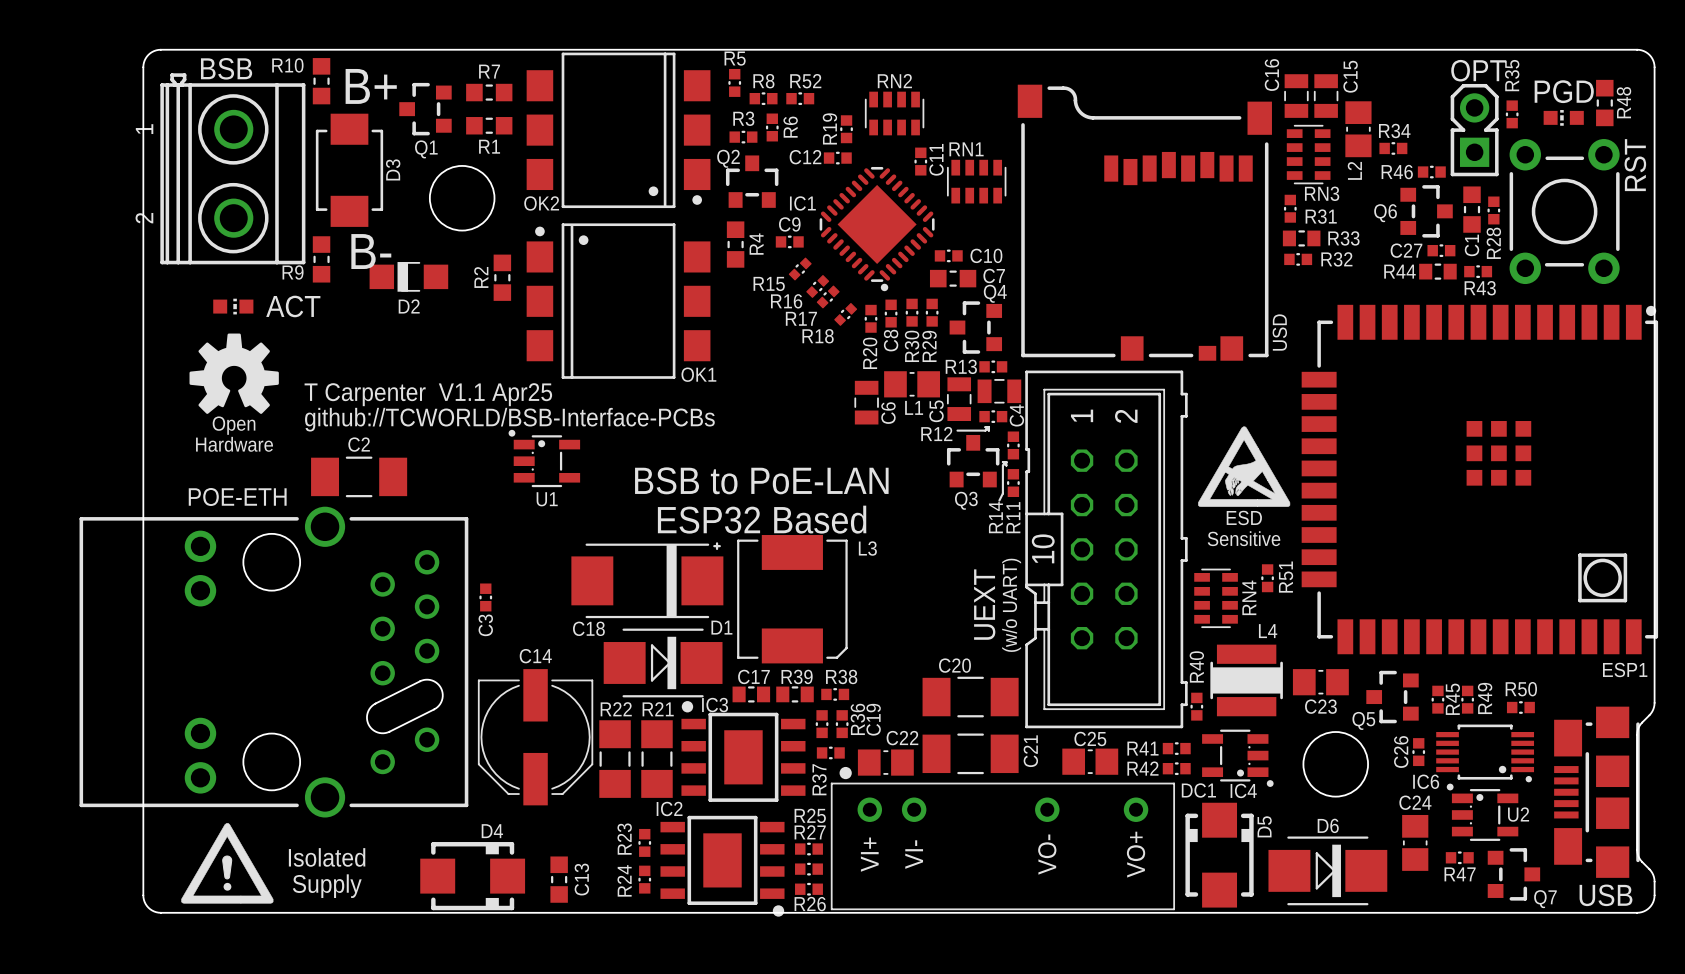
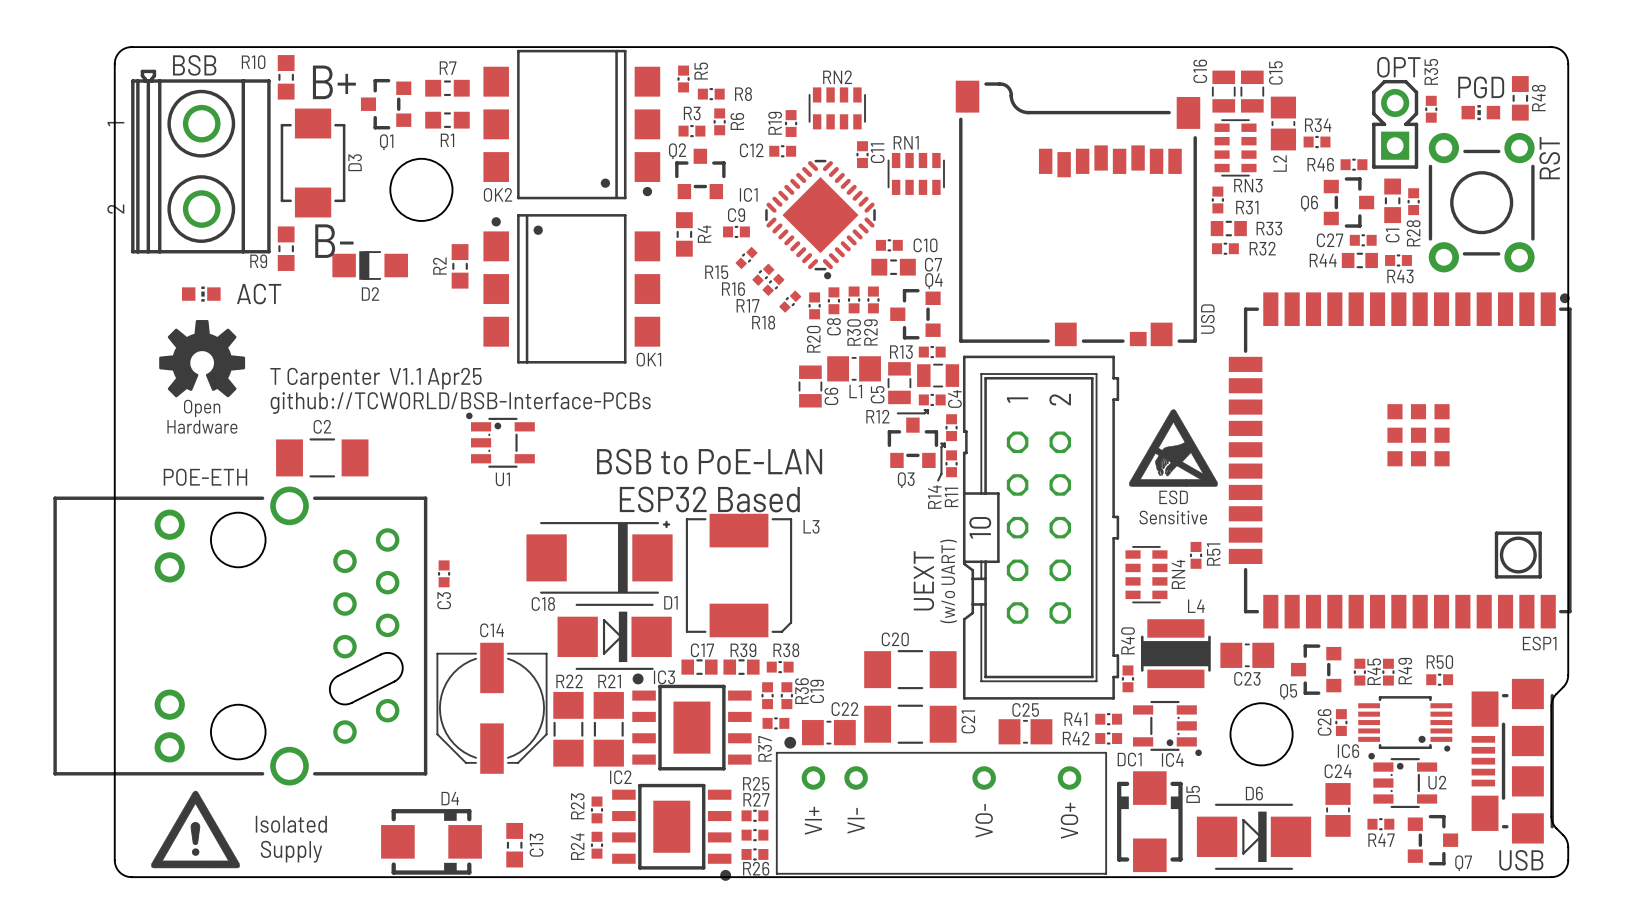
R5 name rotation: 0° (735, 58) -> 90° counterclockwise (701, 71)
R8 name position: R8 (763, 81) -> R8 (743, 94)
R52: (800, 98) -> none

